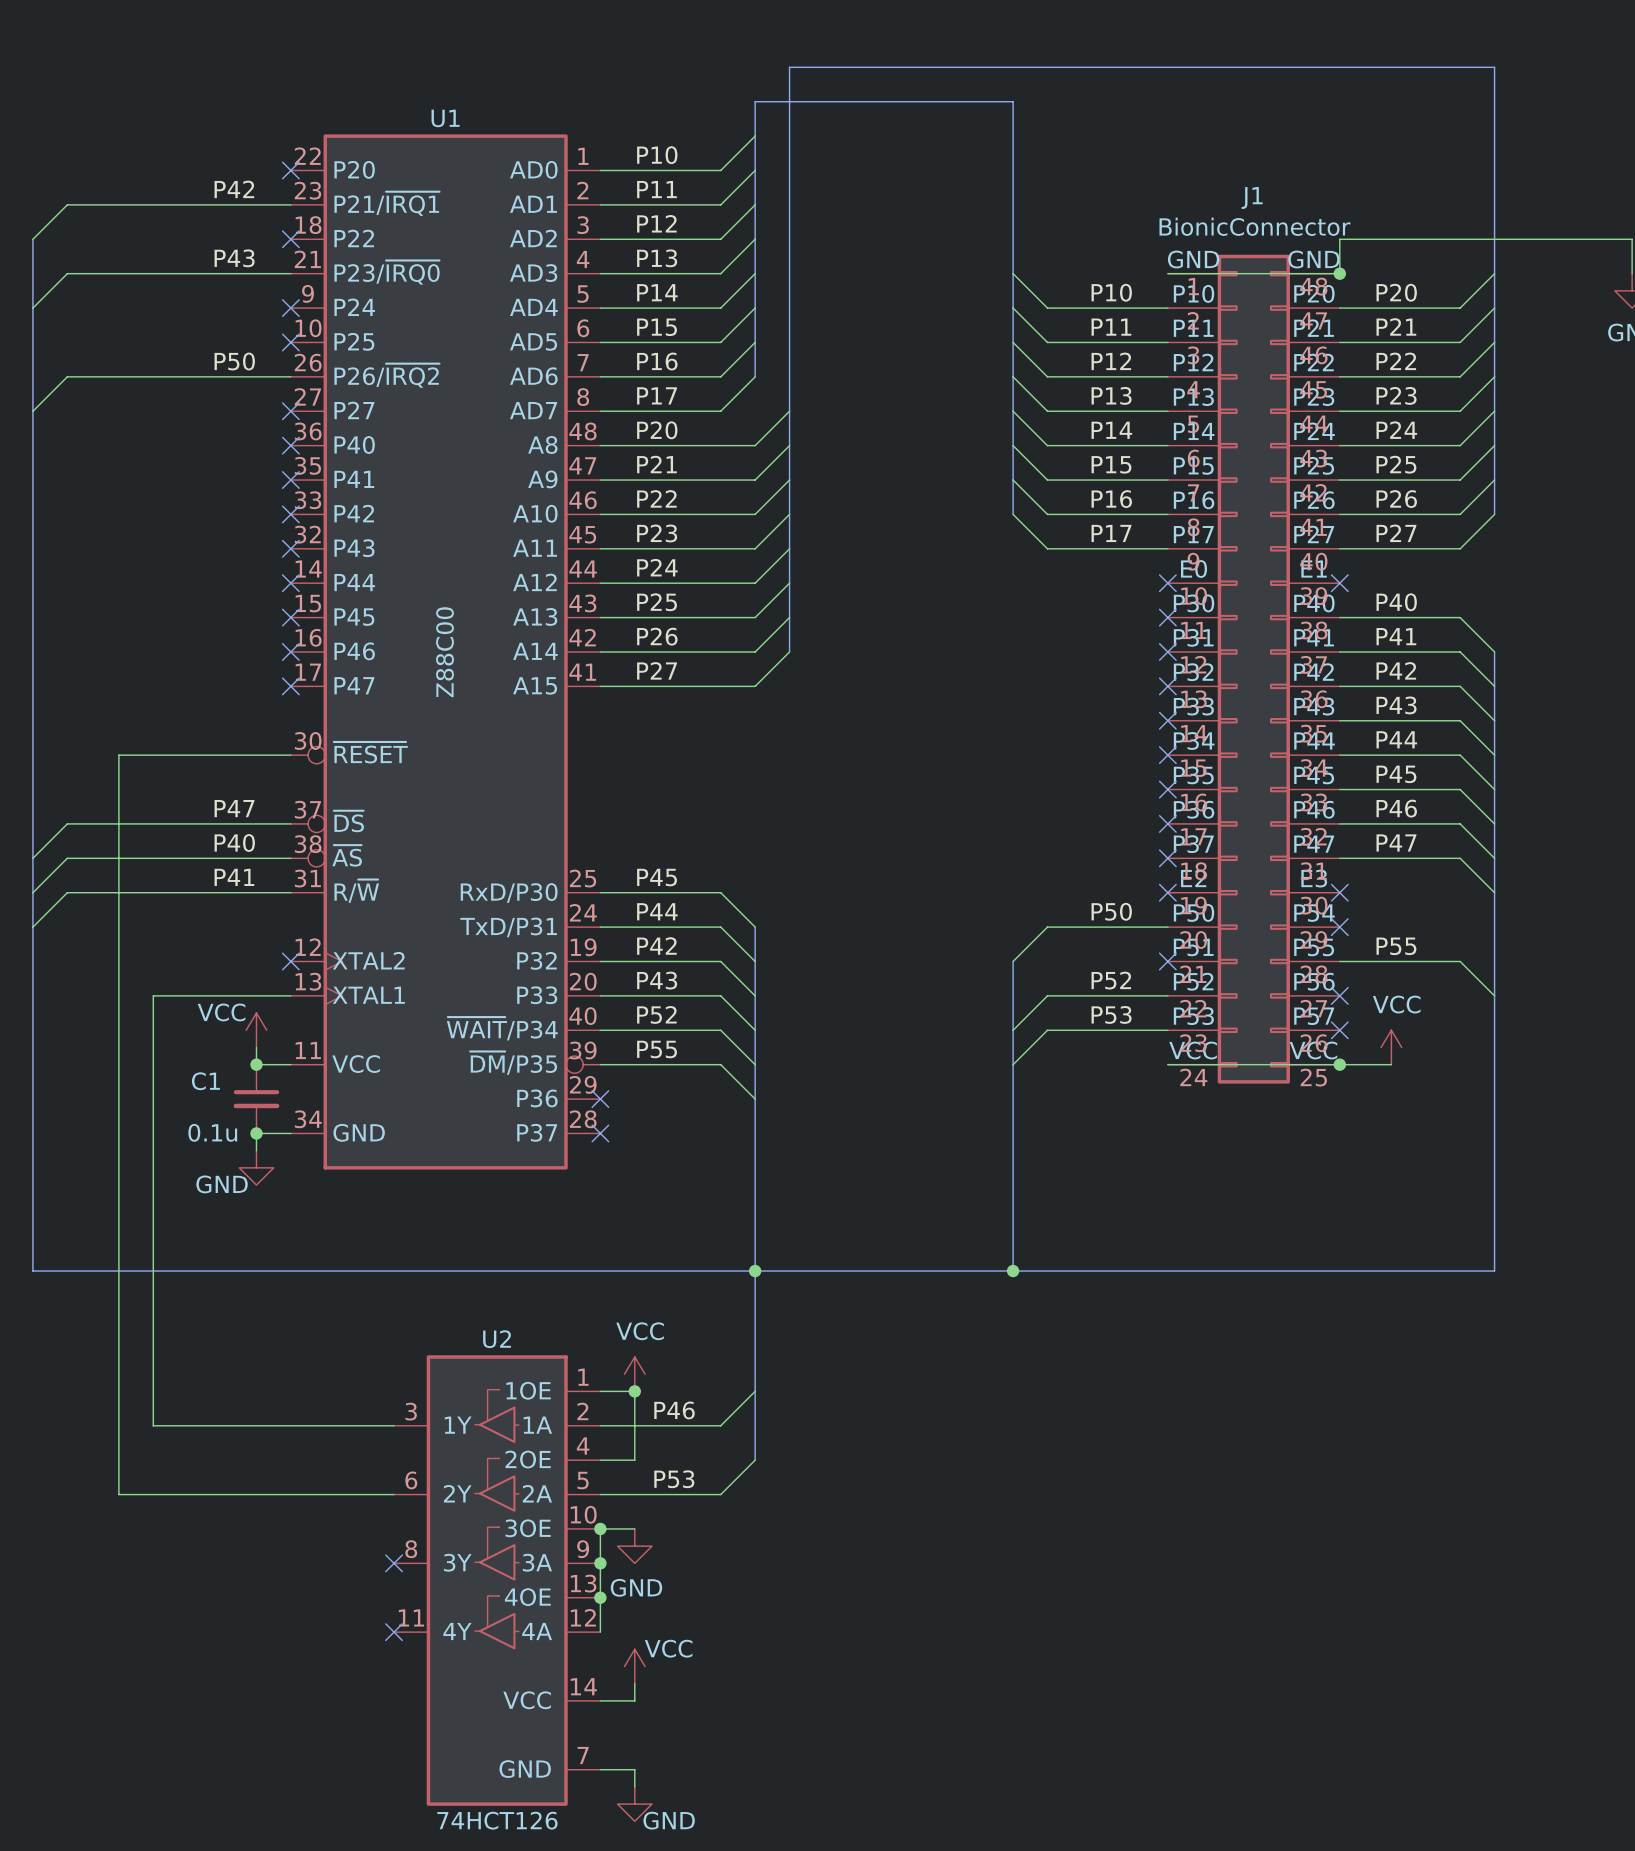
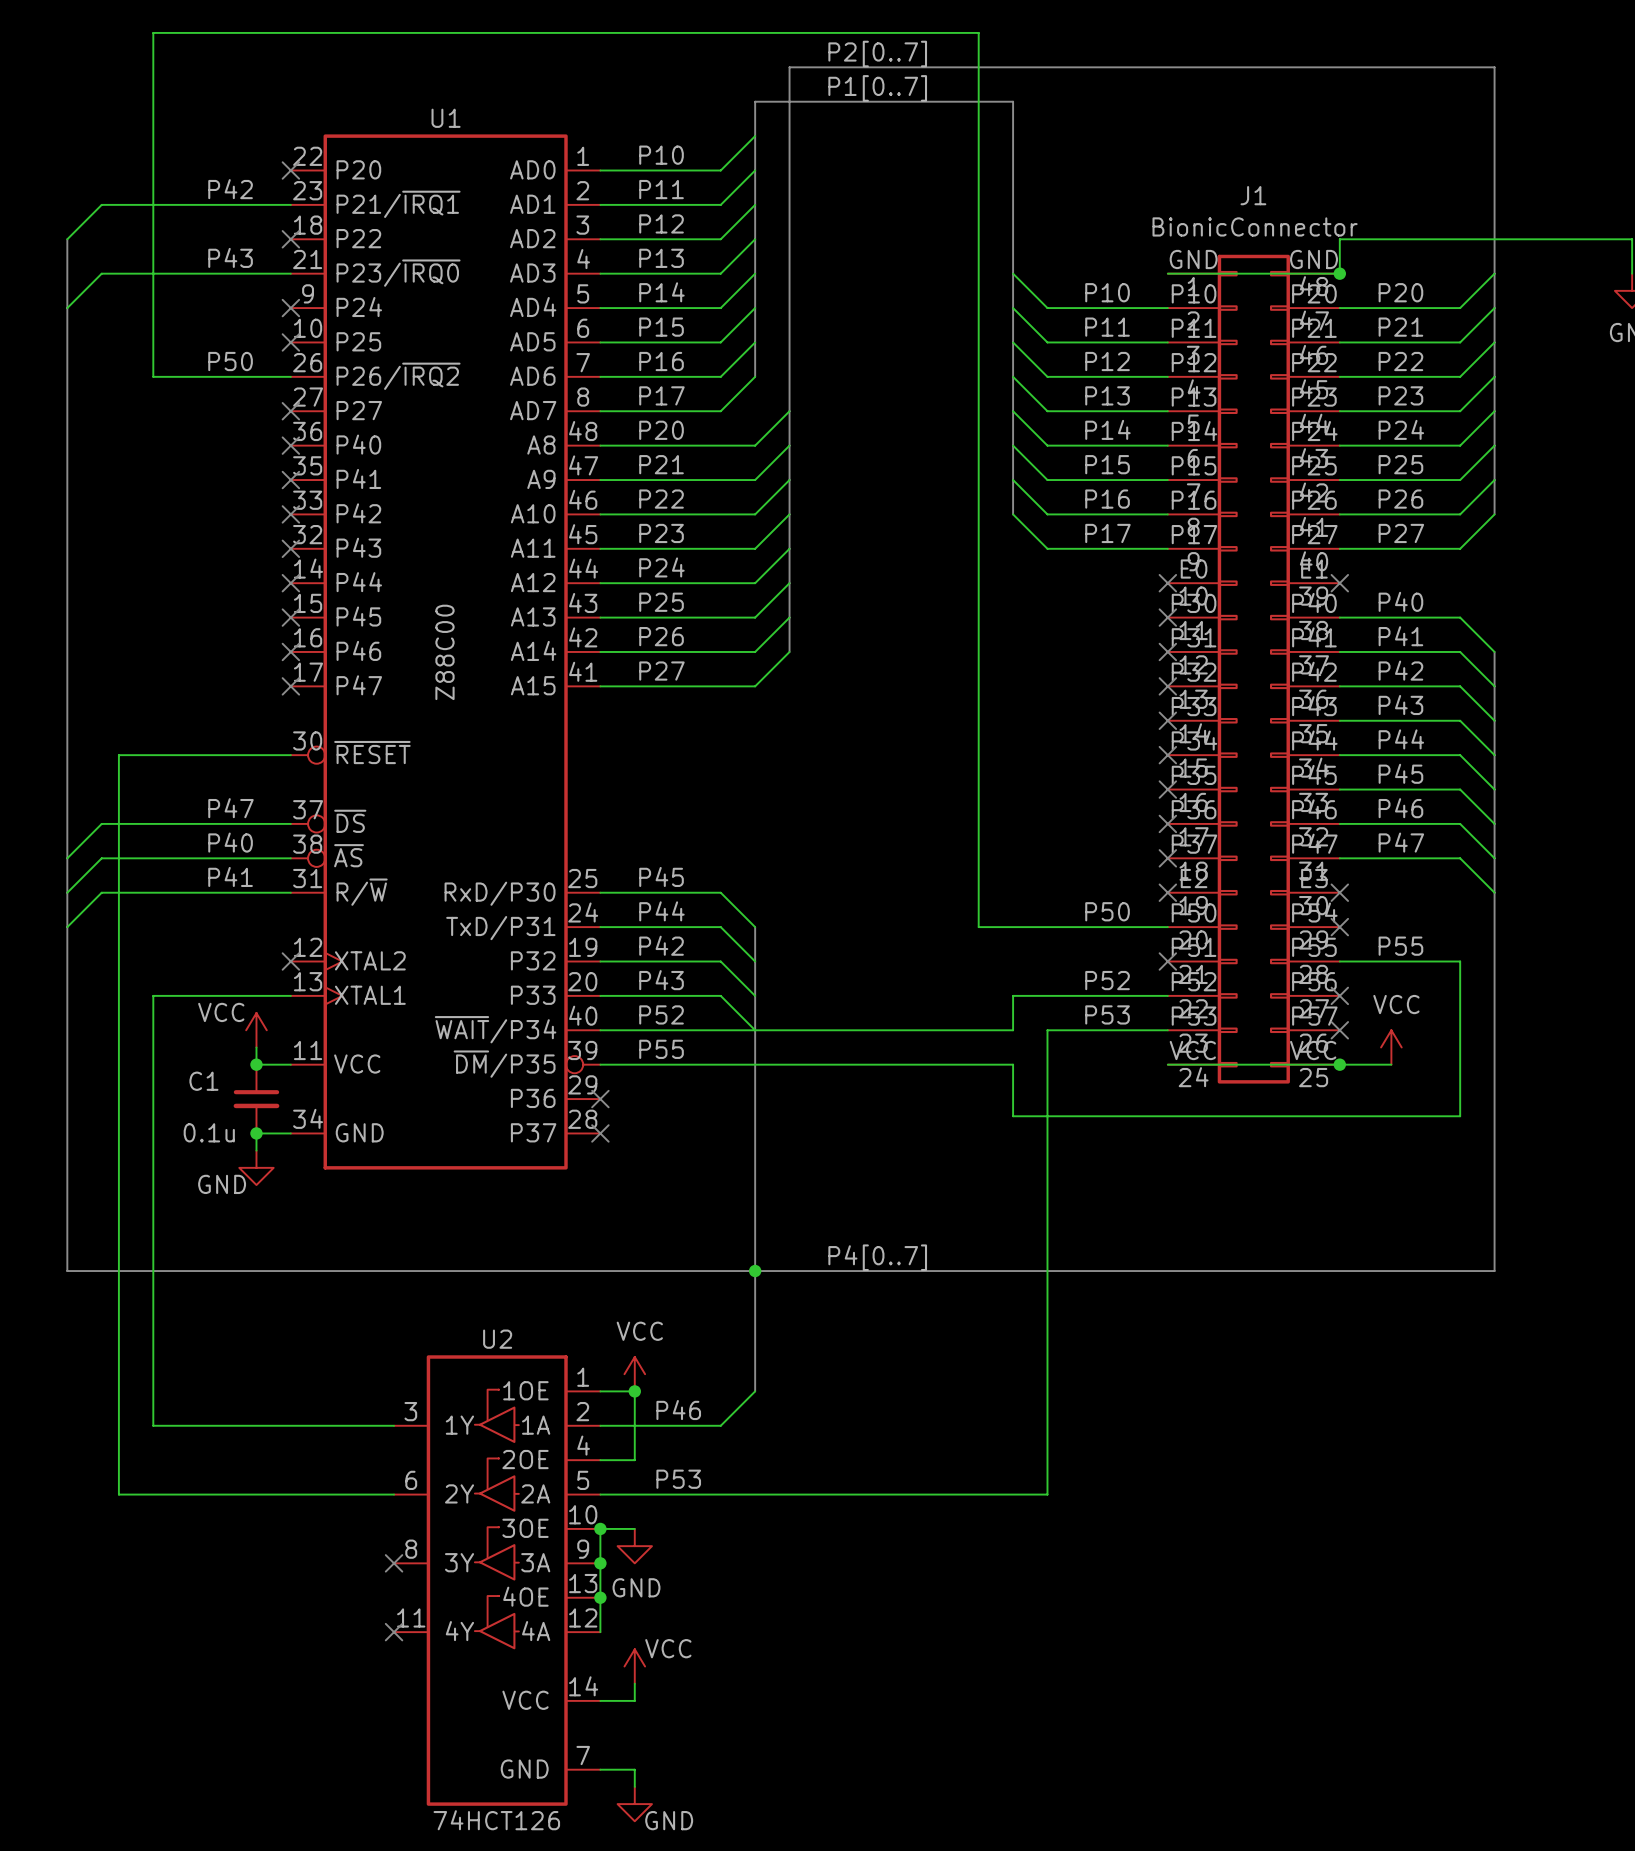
label: none -> P2[0..7] (877, 54)
label: none -> P1[0..7] (877, 88)
wire: (101, 204) (67, 204) (32, 239) -> (101, 204) (67, 239)
bus: (32, 239) (32, 1271) (67, 1271) -> (67, 239) (67, 1271)
wire: (101, 273) (67, 273) (32, 308) -> (101, 273) (67, 308)
wire: (153, 376) (67, 376) (32, 411) -> none
wire: (101, 823) (67, 823) (32, 858) -> (101, 823) (67, 858)
wire: (101, 858) (67, 858) (32, 892) -> (101, 858) (67, 892)
wire: (101, 892) (67, 892) (32, 927) -> (101, 892) (67, 927)
wire: (1047, 927) (1013, 961) -> (1047, 927) (978, 927) (978, 32) (153, 32) (153, 376)
bus: (1013, 961) (1013, 1271) -> none
wire: (1460, 961) (1494, 995) -> none
wire: (1047, 995) (1013, 1030) -> (1047, 995) (1013, 995) (1013, 1030) (720, 1030)
wire: (720, 1030) (755, 1064) -> none
wire: (1047, 1030) (1013, 1064) -> (1047, 1030) (1047, 1494) (720, 1494)
wire: (720, 1064) (755, 1099) -> (720, 1064) (1013, 1064) (1013, 1116) (1460, 1116) (1460, 961)
label: none -> P4[0..7] (877, 1257)
junction: (1013, 1271) -> none
bus: (755, 1391) (755, 1460) -> none
wire: (755, 1460) (720, 1494) -> none

